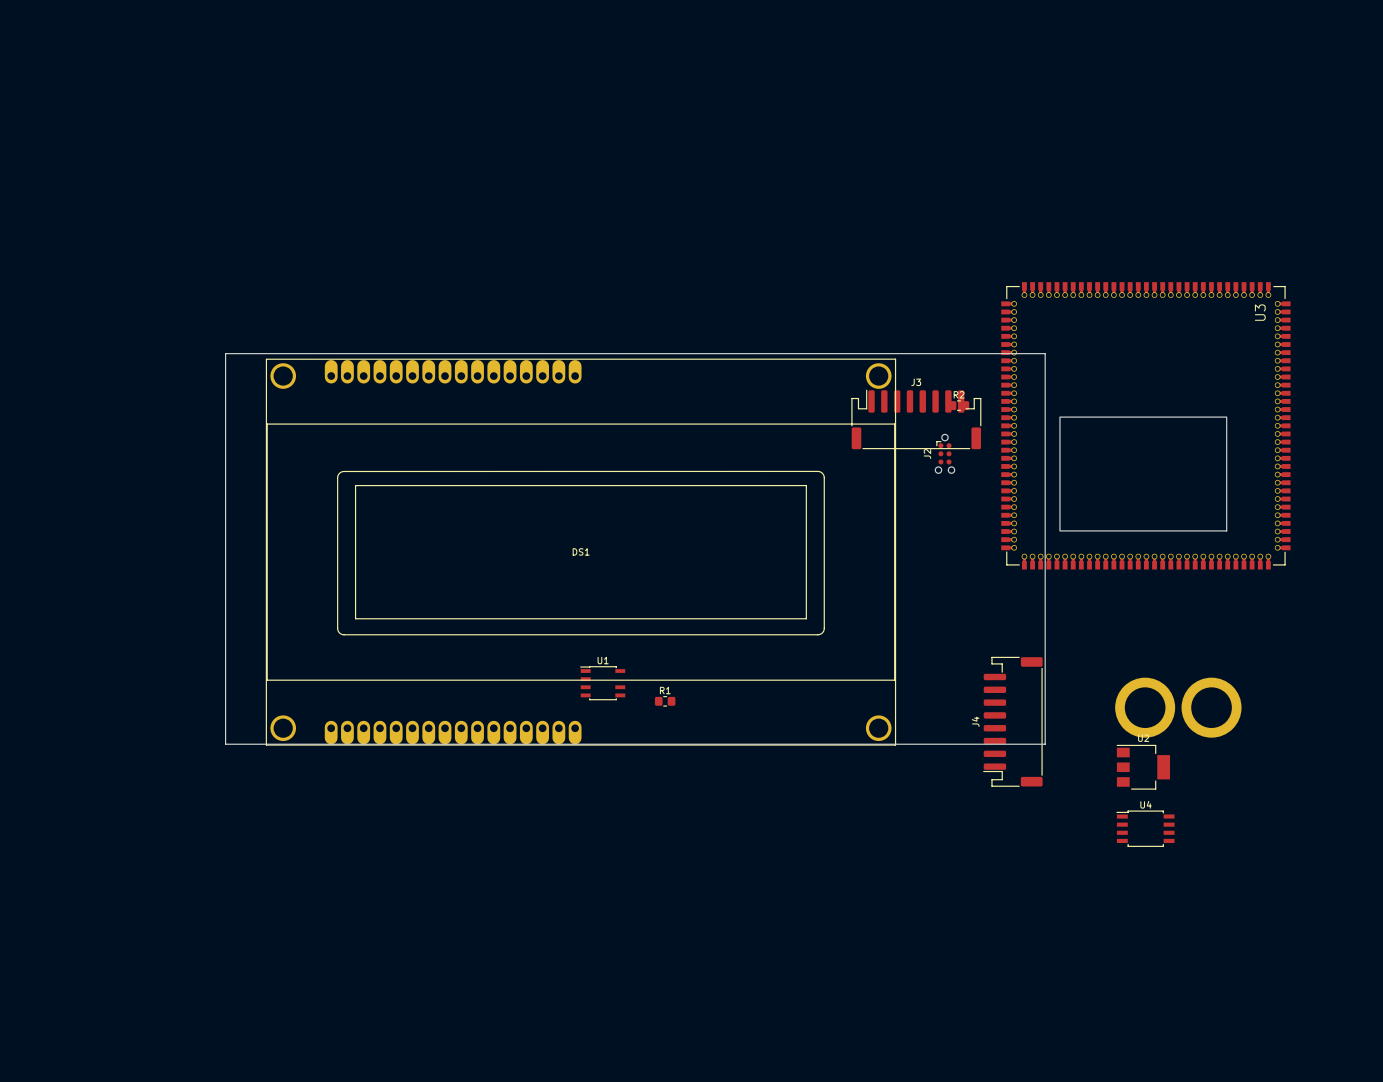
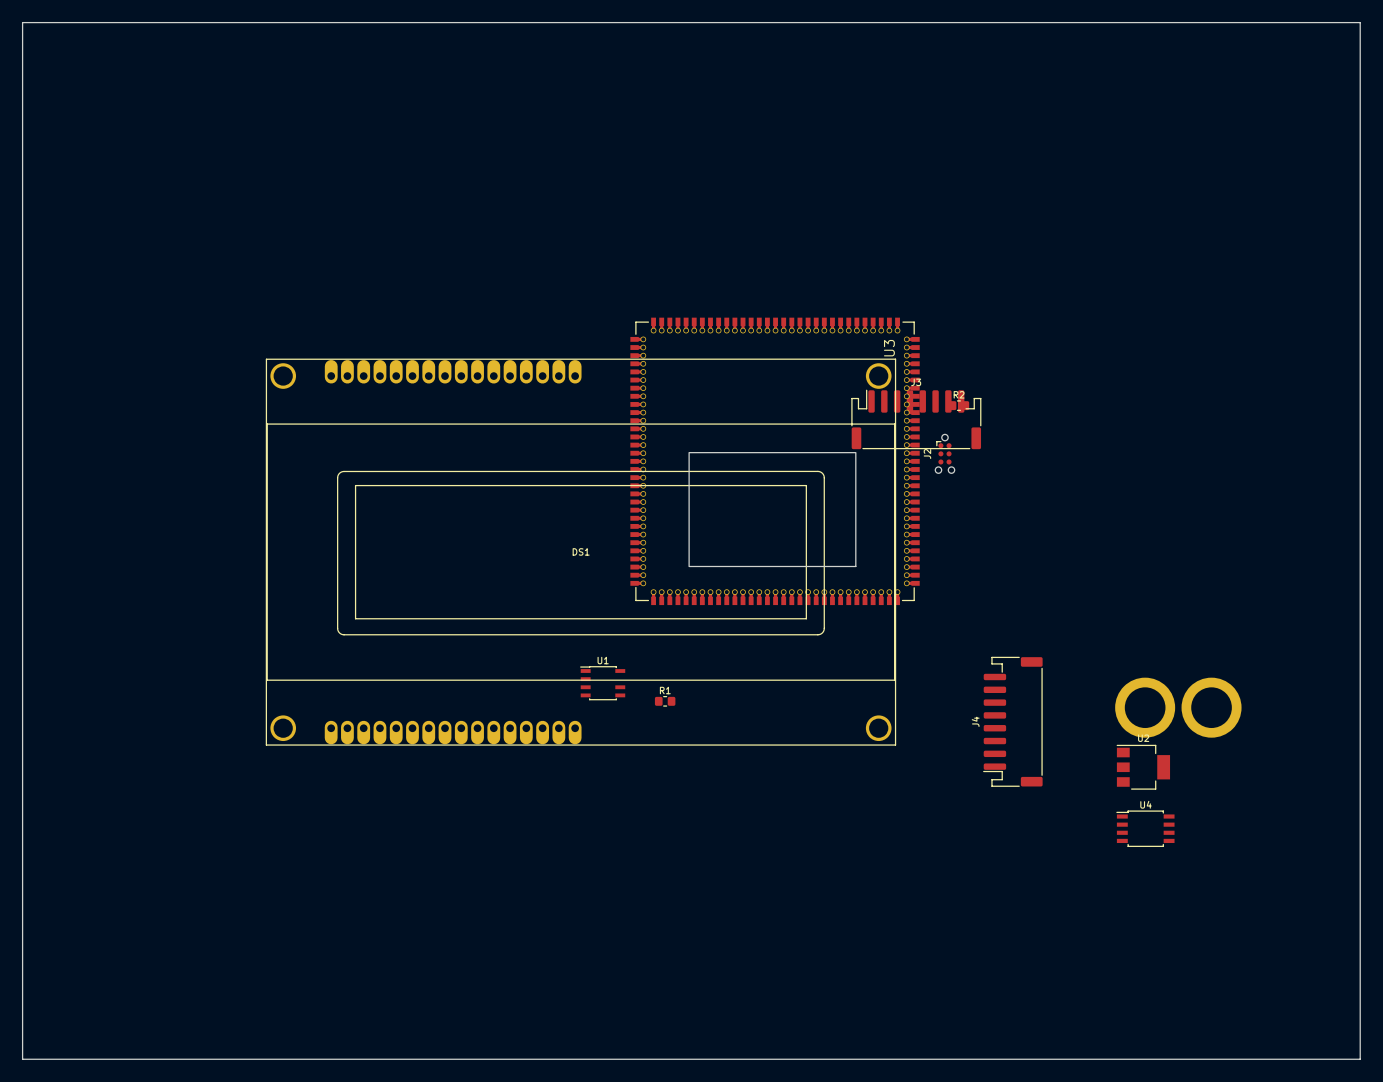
board edge: none -> (22, 22) (1360, 22) (1360, 1059) (22, 1059) (22, 22)
board edge: (225, 353) (1045, 353) (1045, 744) (225, 744) (225, 353) -> none
U3 position: (1145, 425) -> (775, 461)

